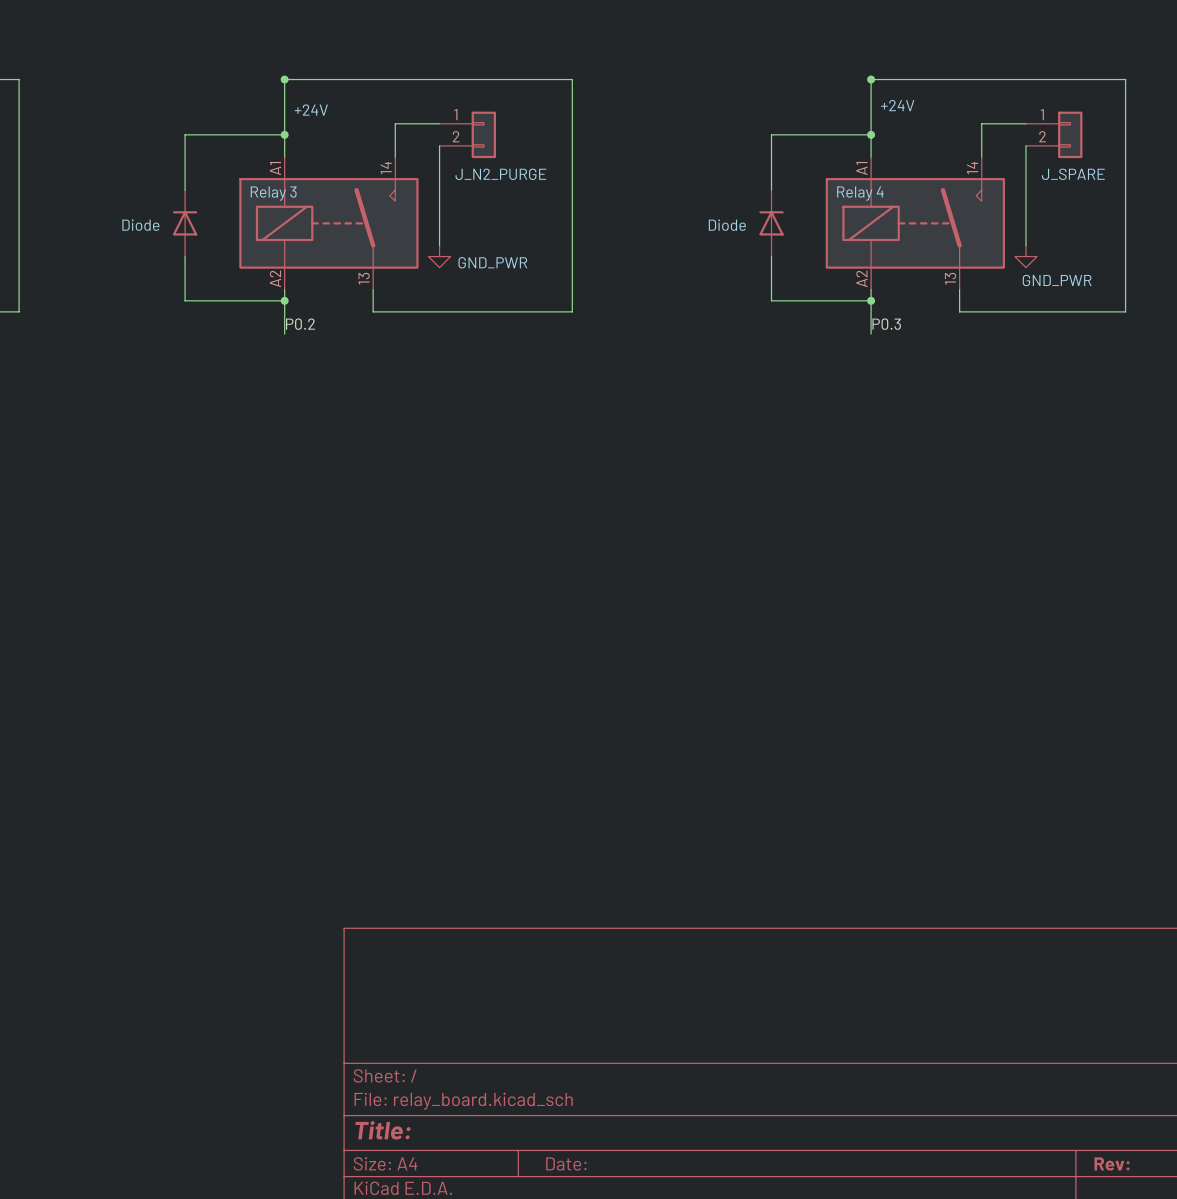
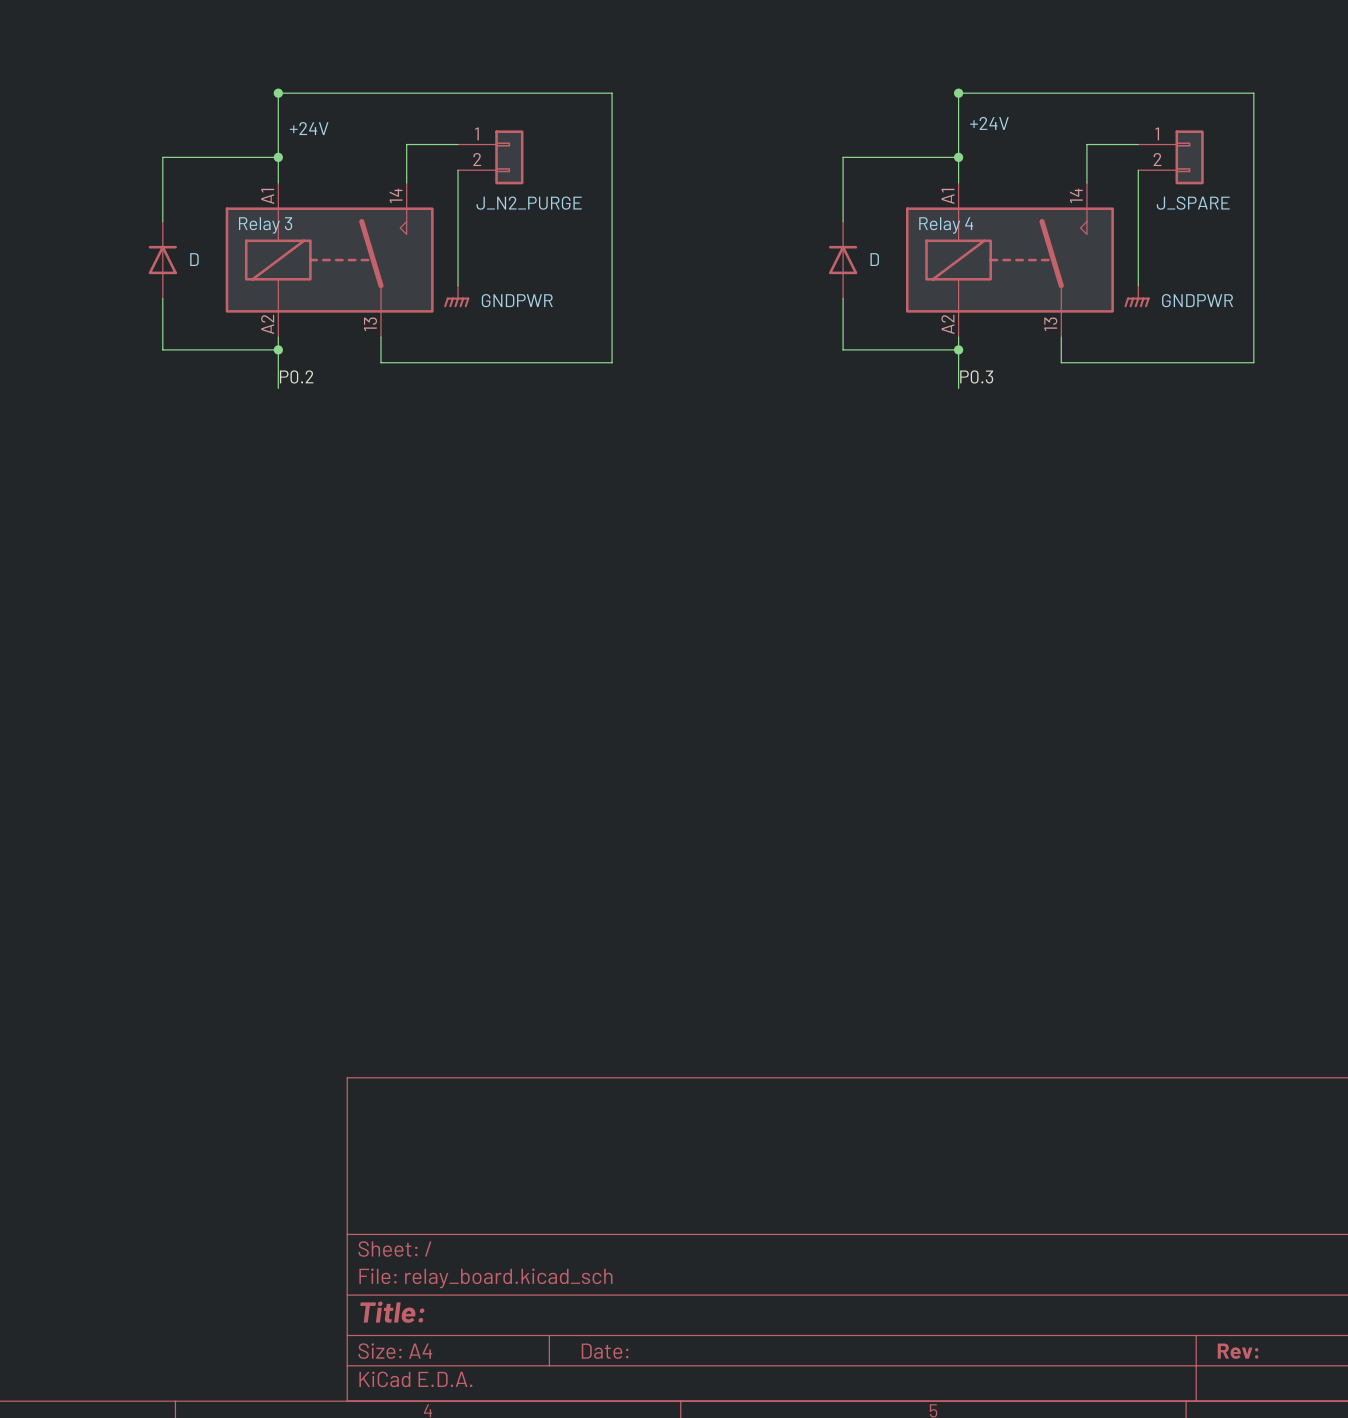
part value: Diode (140, 225) -> D (194, 259)
part value: Diode (727, 225) -> D (874, 259)
power symbol: GND_PWR (439, 256) -> GNDPWR (456, 296)
power symbol: GND_PWR (1025, 256) -> GNDPWR (1137, 296)

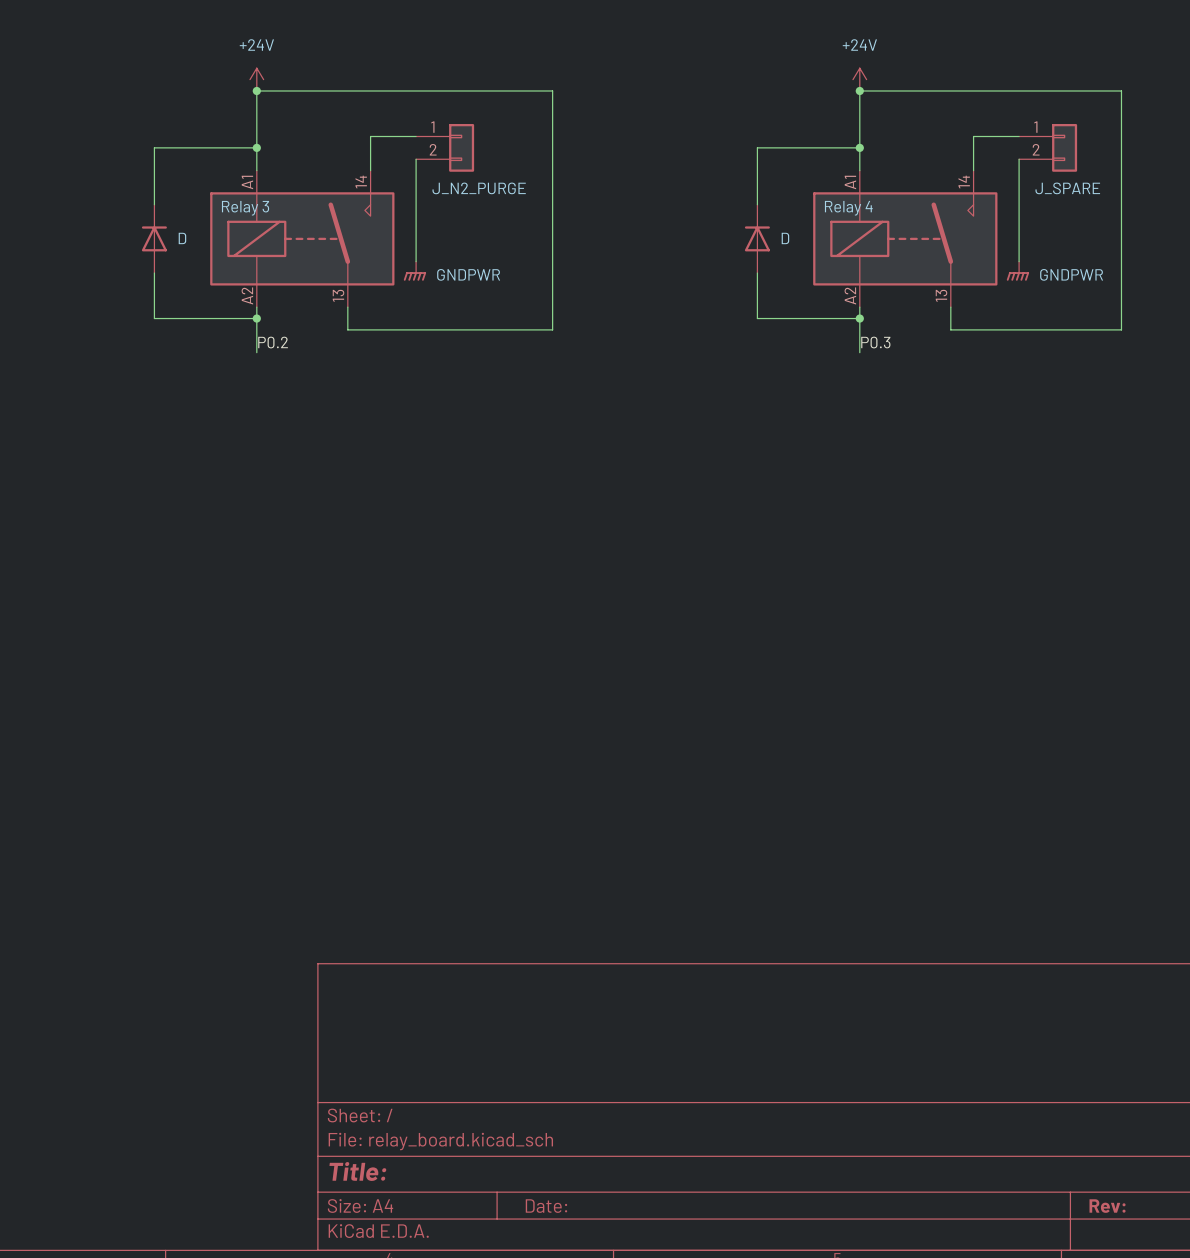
power symbol: none -> +24V (256, 79)
power symbol: none -> +24V (859, 79)
power symbol: +24V (989, 123) -> none
power symbol: +24V (309, 128) -> none

